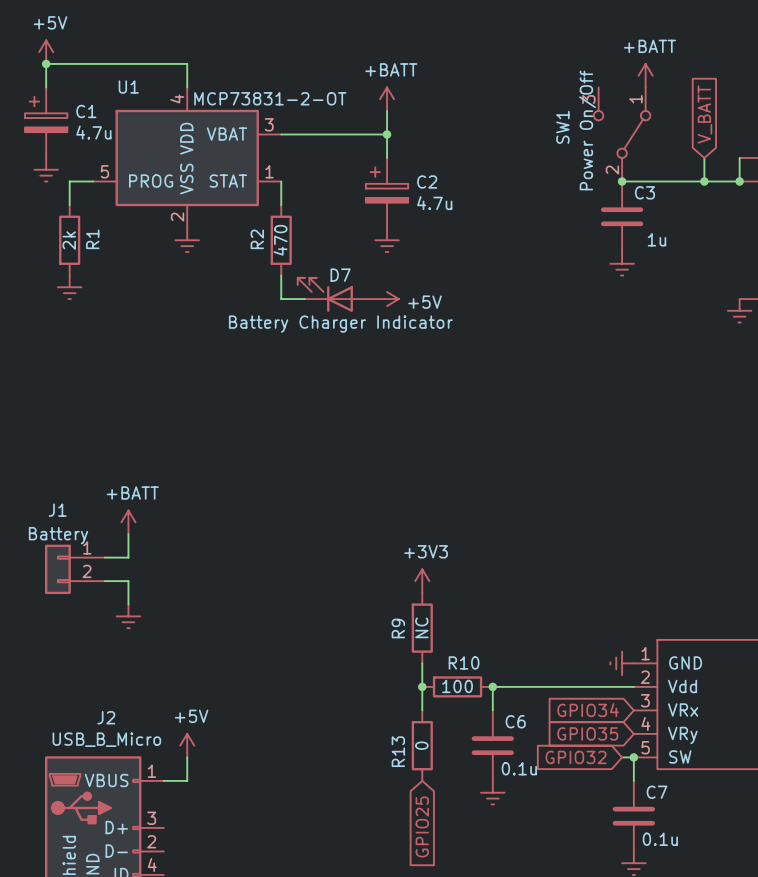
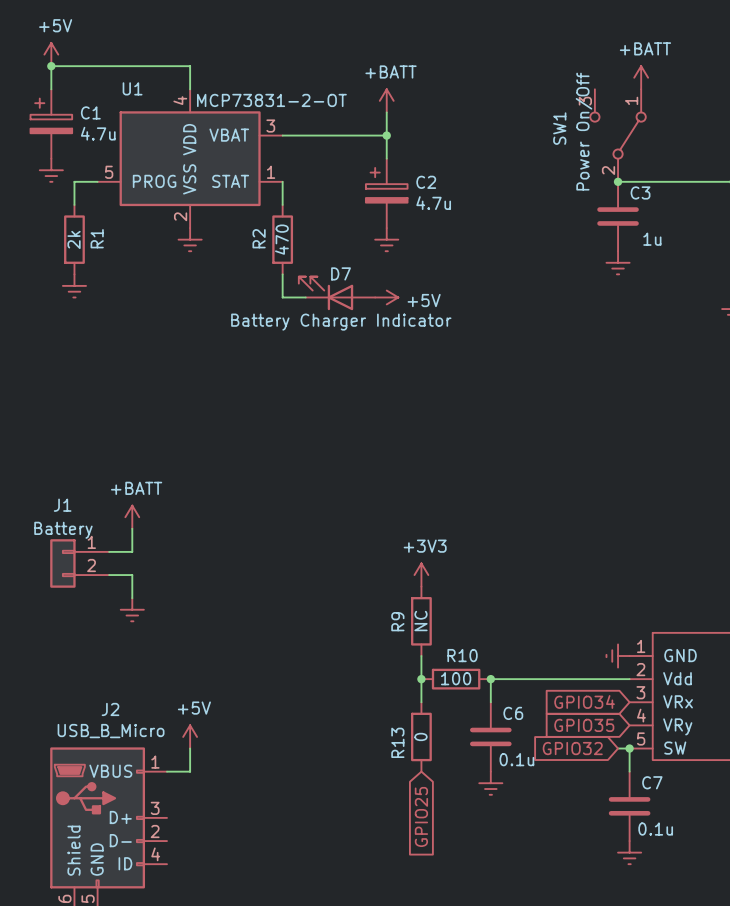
global label: V_BATT (704, 114) -> none
wire: (704, 157) (704, 181) -> none
junction: (704, 181) -> none

